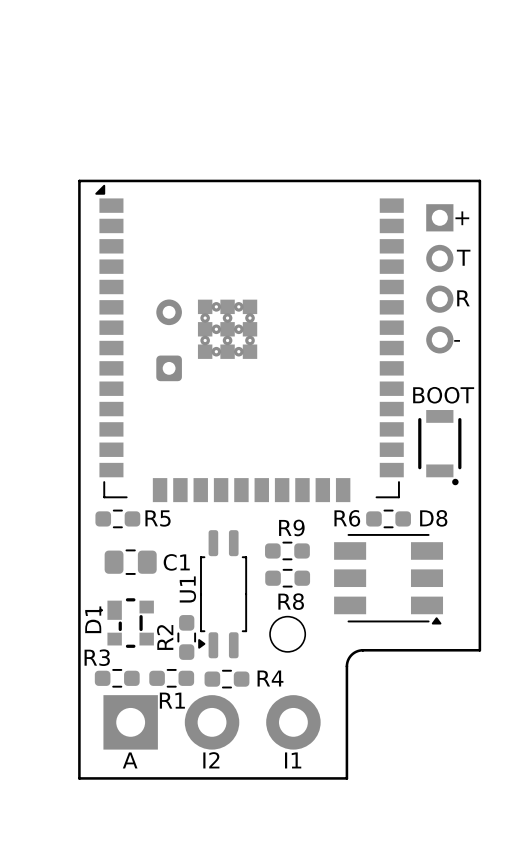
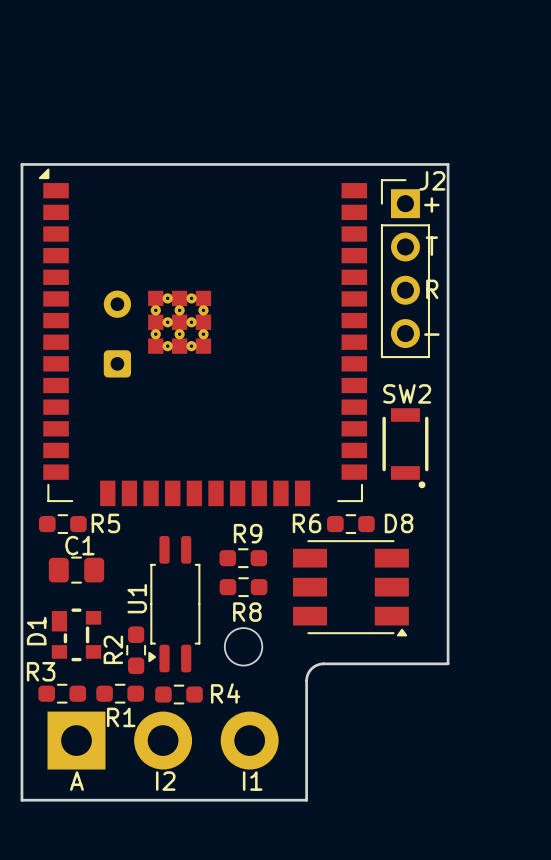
J2 side: bottom (439, 278) -> top (405, 268)
text: BOOT (443, 395) -> none
SW2 name: none -> SW2 (407, 393)
C1 name position: C1 (176, 562) -> C1 (79, 545)

